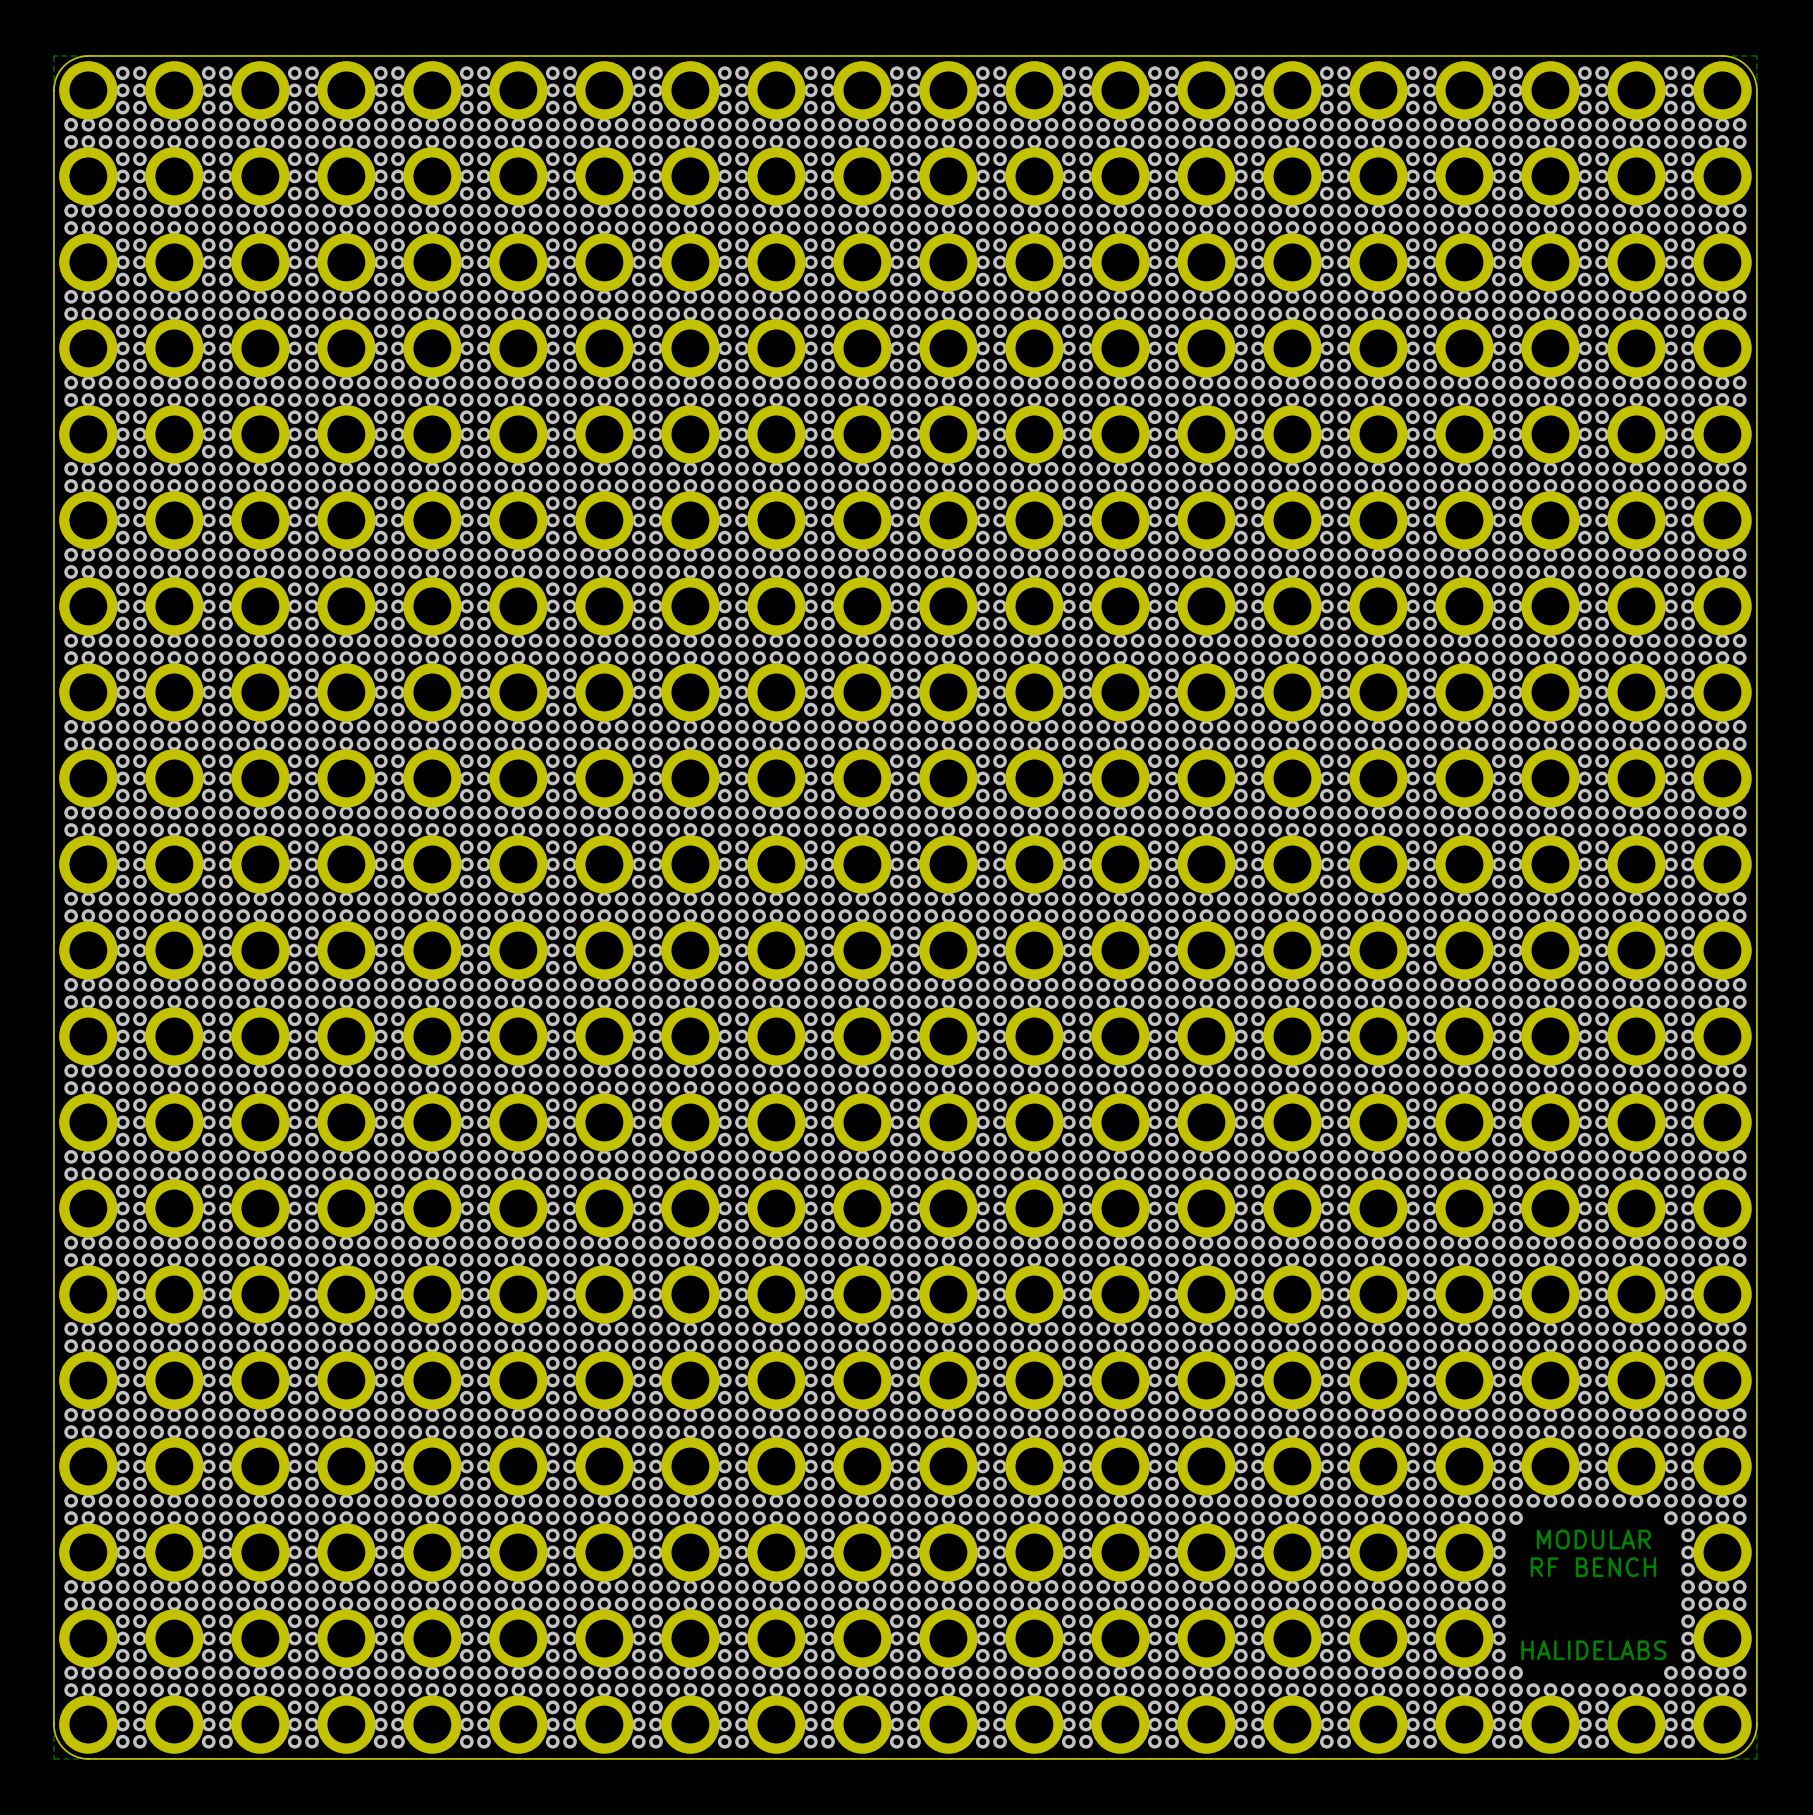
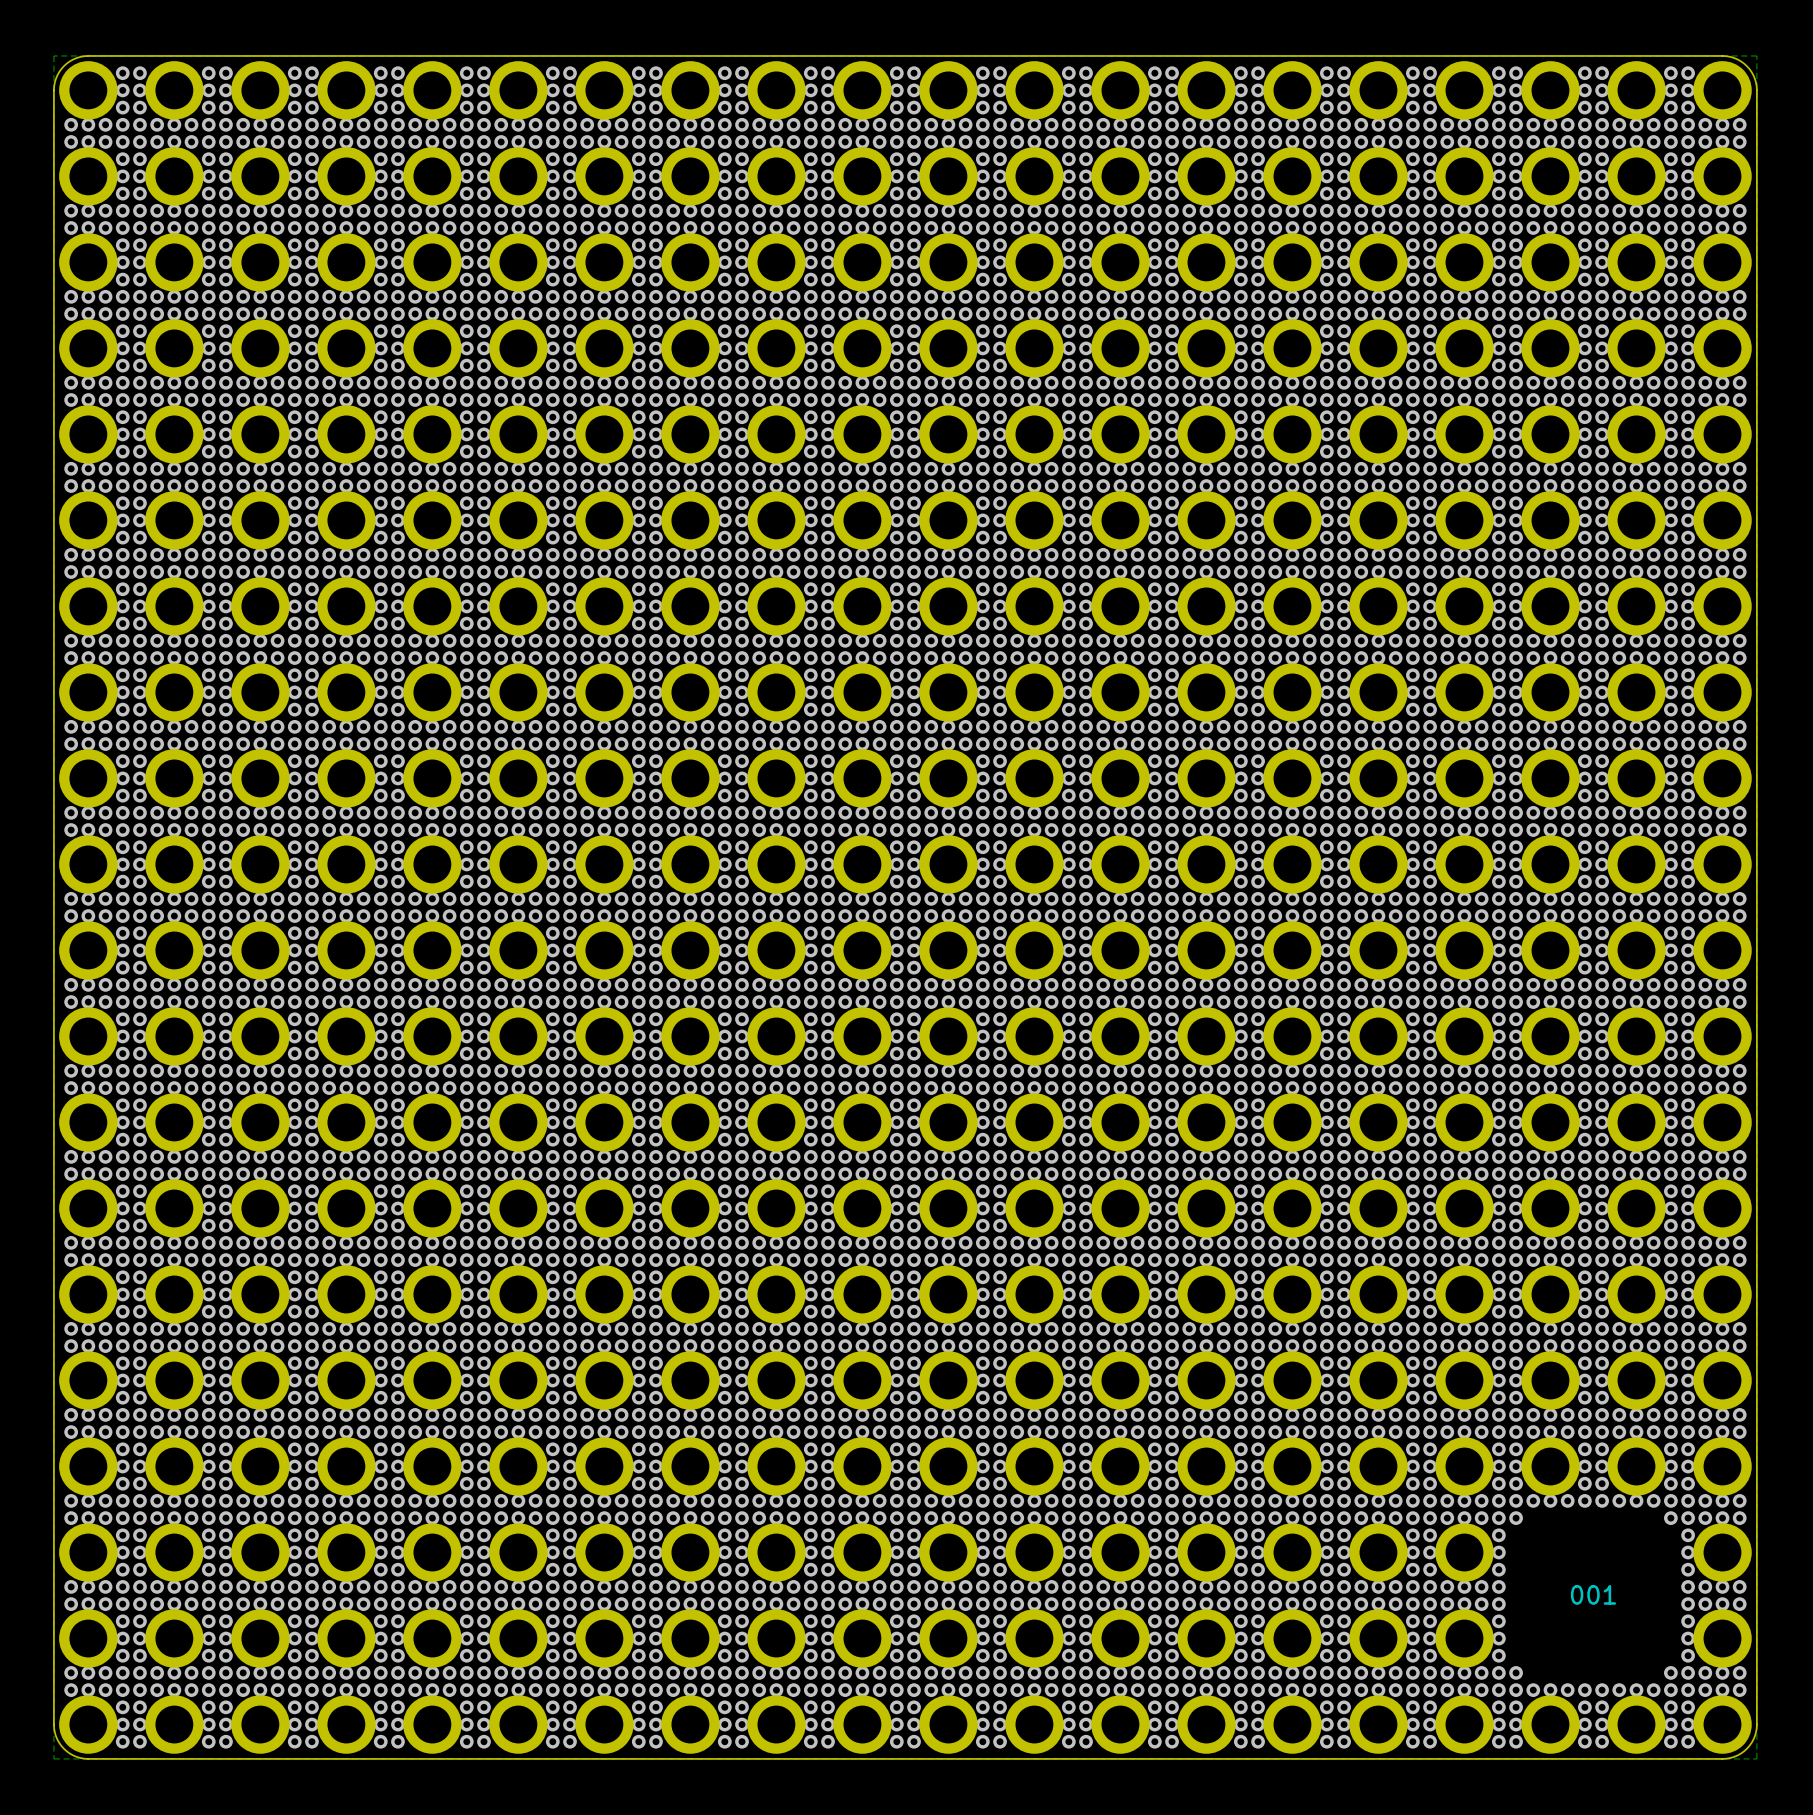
text: MODULAR (1593, 1539) -> none
text: RF BENCH (1593, 1567) -> none
text: none -> 001 (1593, 1594)
text: HALIDELABS (1593, 1650) -> none

